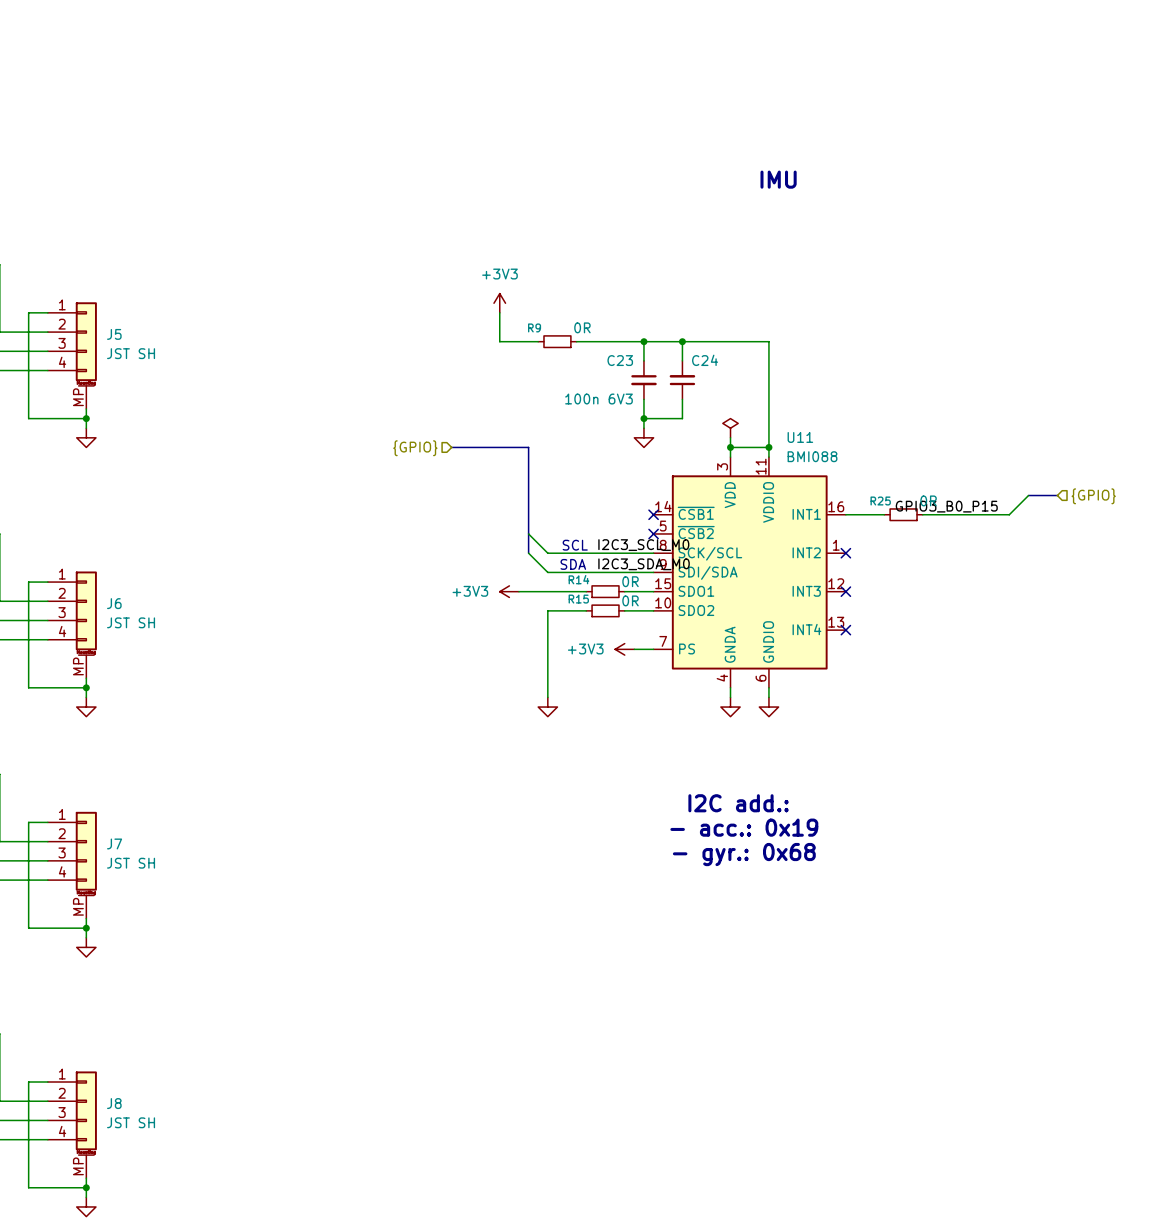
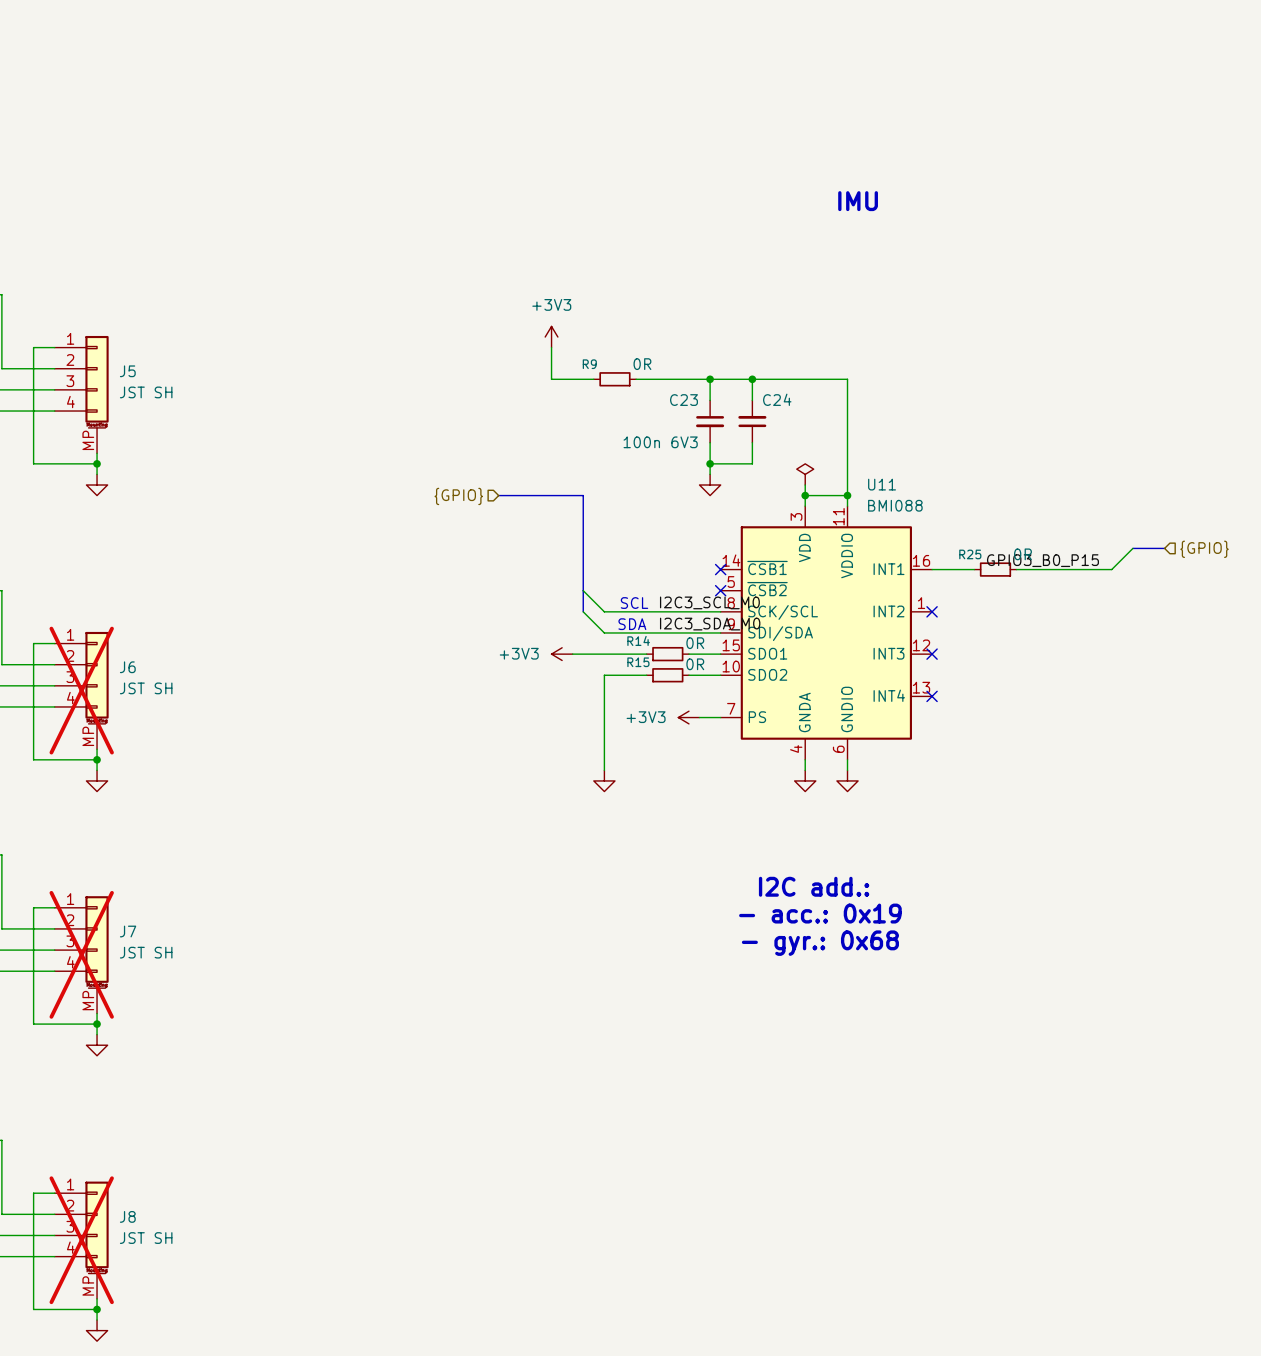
J6 do-not-place cross: none -> (81, 690)
J7 do-not-place cross: none -> (81, 954)
J8 do-not-place cross: none -> (81, 1240)

